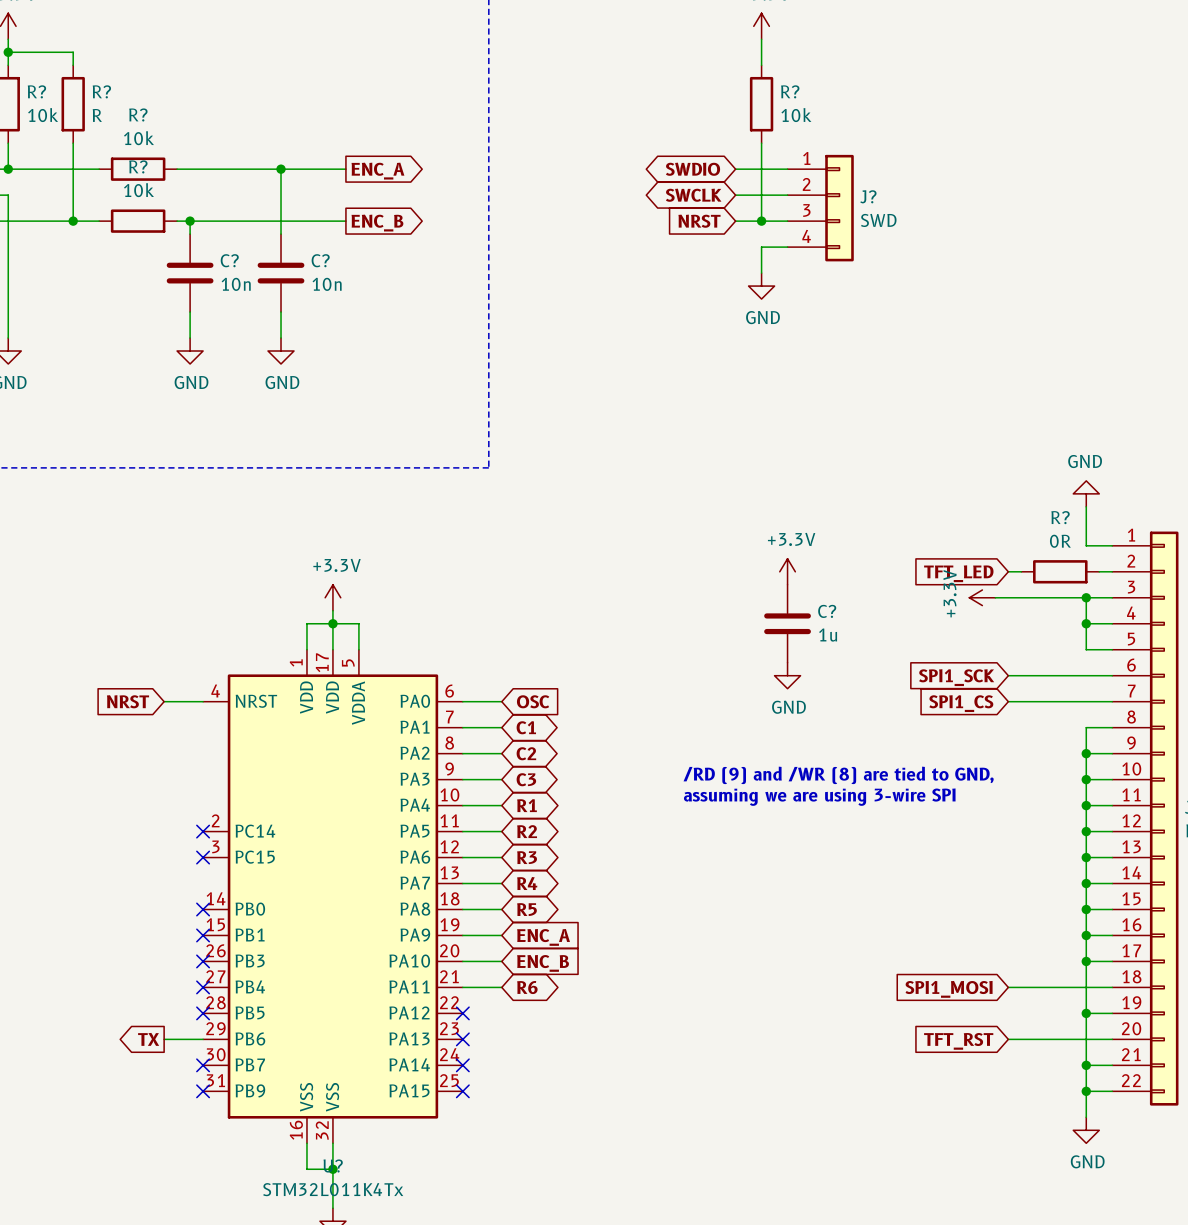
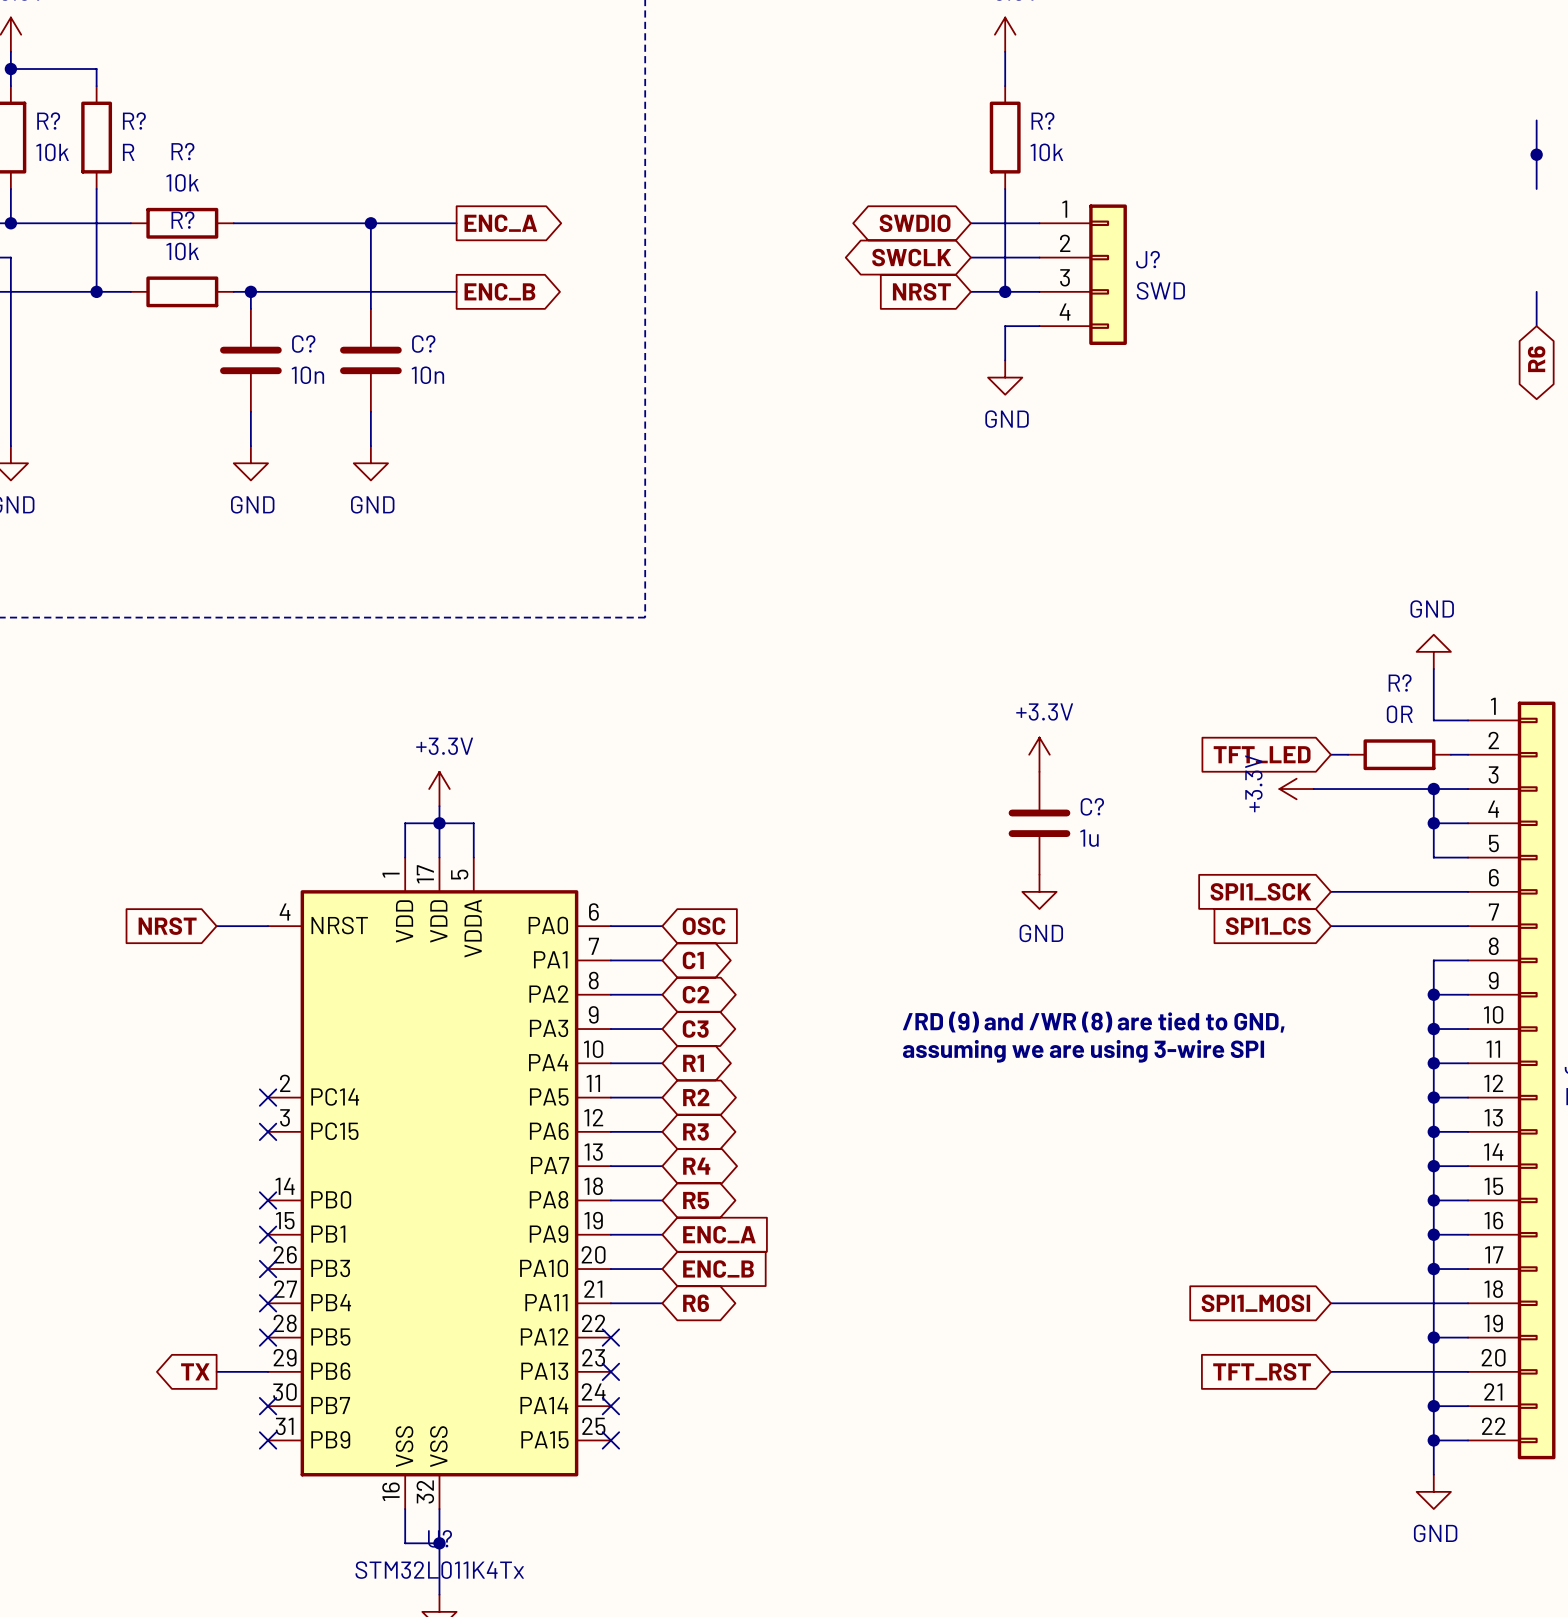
wire: none -> (1536, 120) (1536, 189)
junction: none -> (1536, 154)
wire: none -> (1536, 291) (1536, 326)
global label: none -> R6 (1536, 359)

